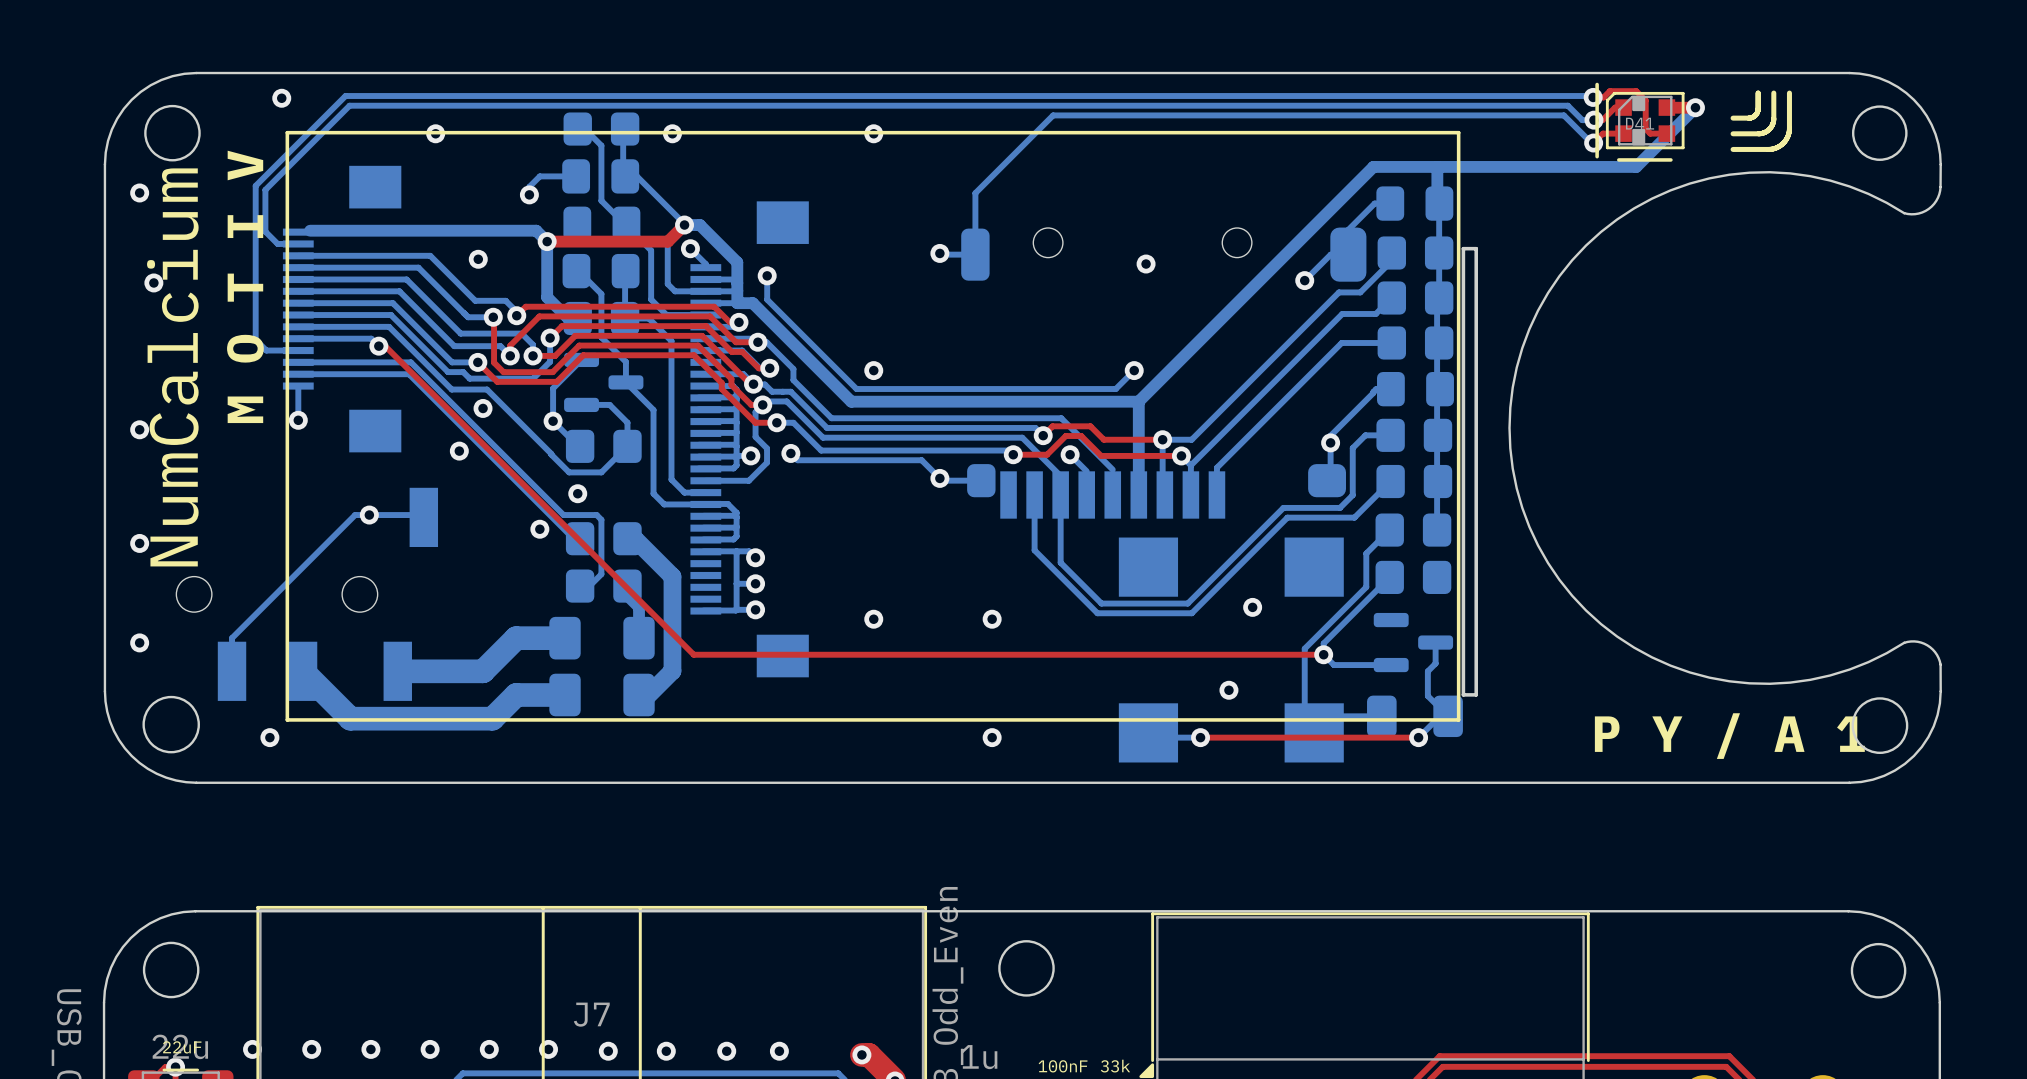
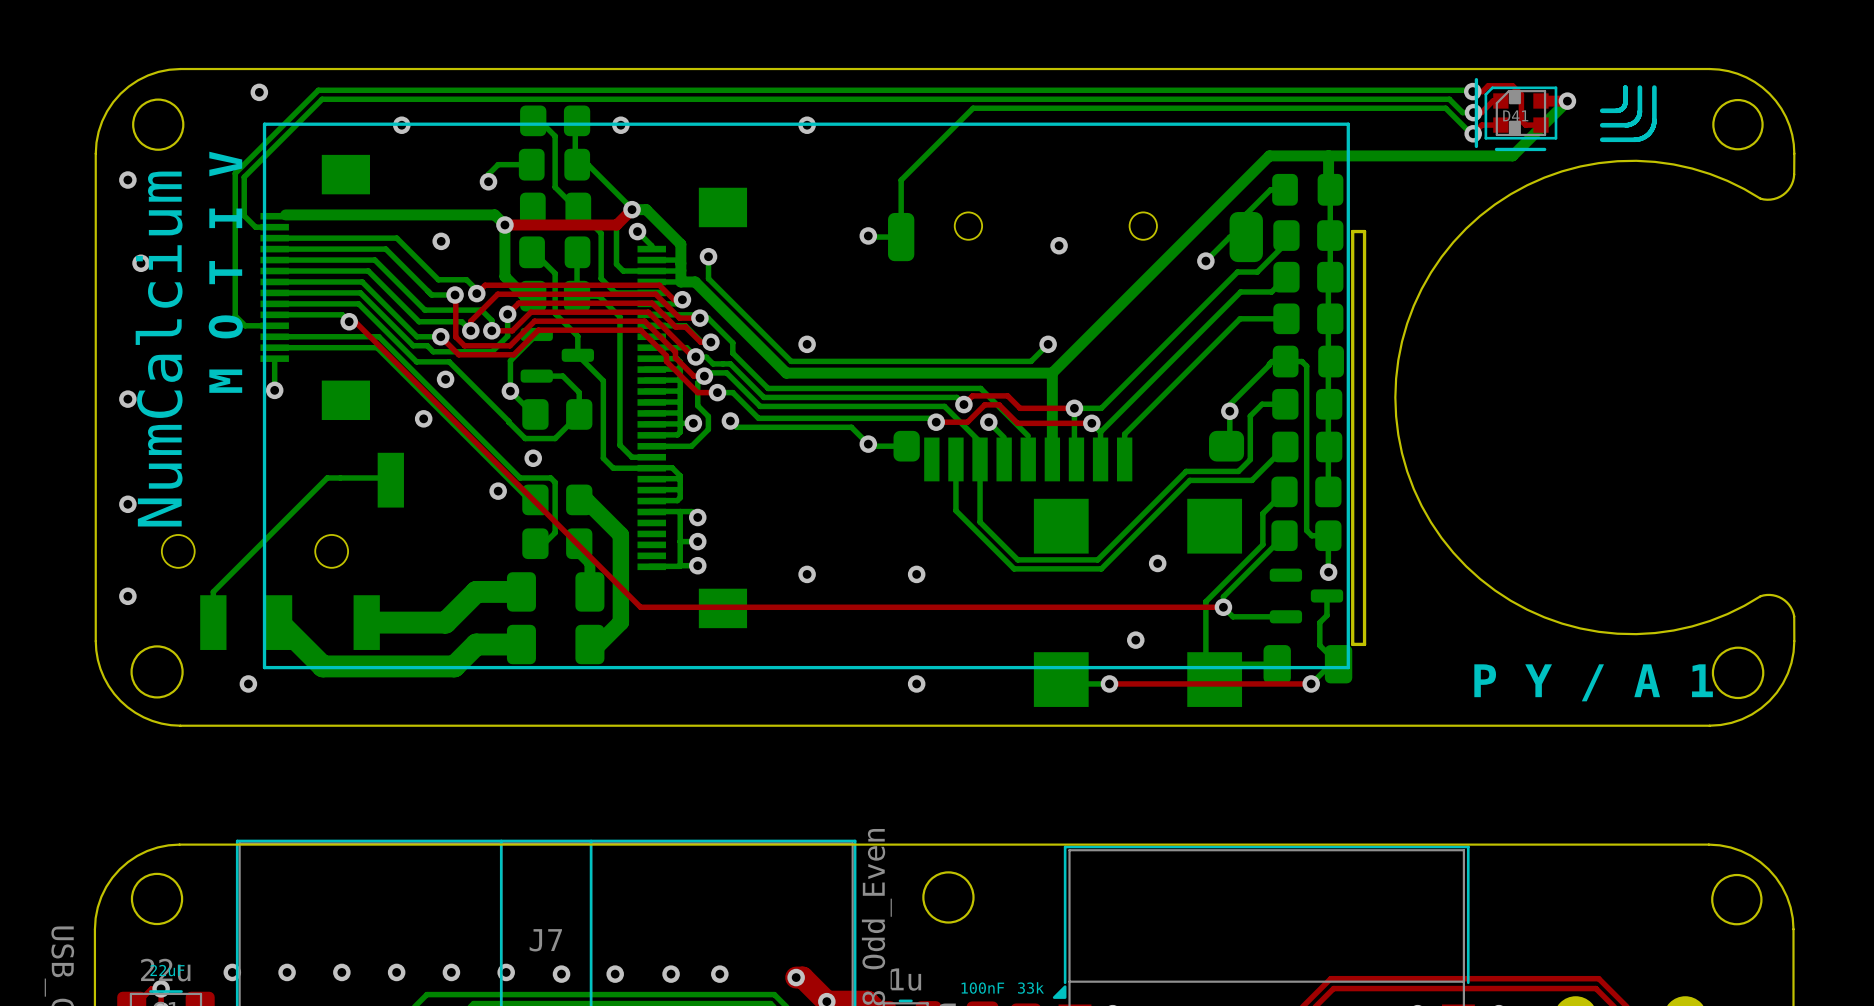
bottom track: none -> (1287, 361) (1301, 361) (1306, 366) (1306, 530) (1311, 535) (1328, 535) (1328, 571)
via: (369, 515) -> none
via: none -> (1328, 572)

